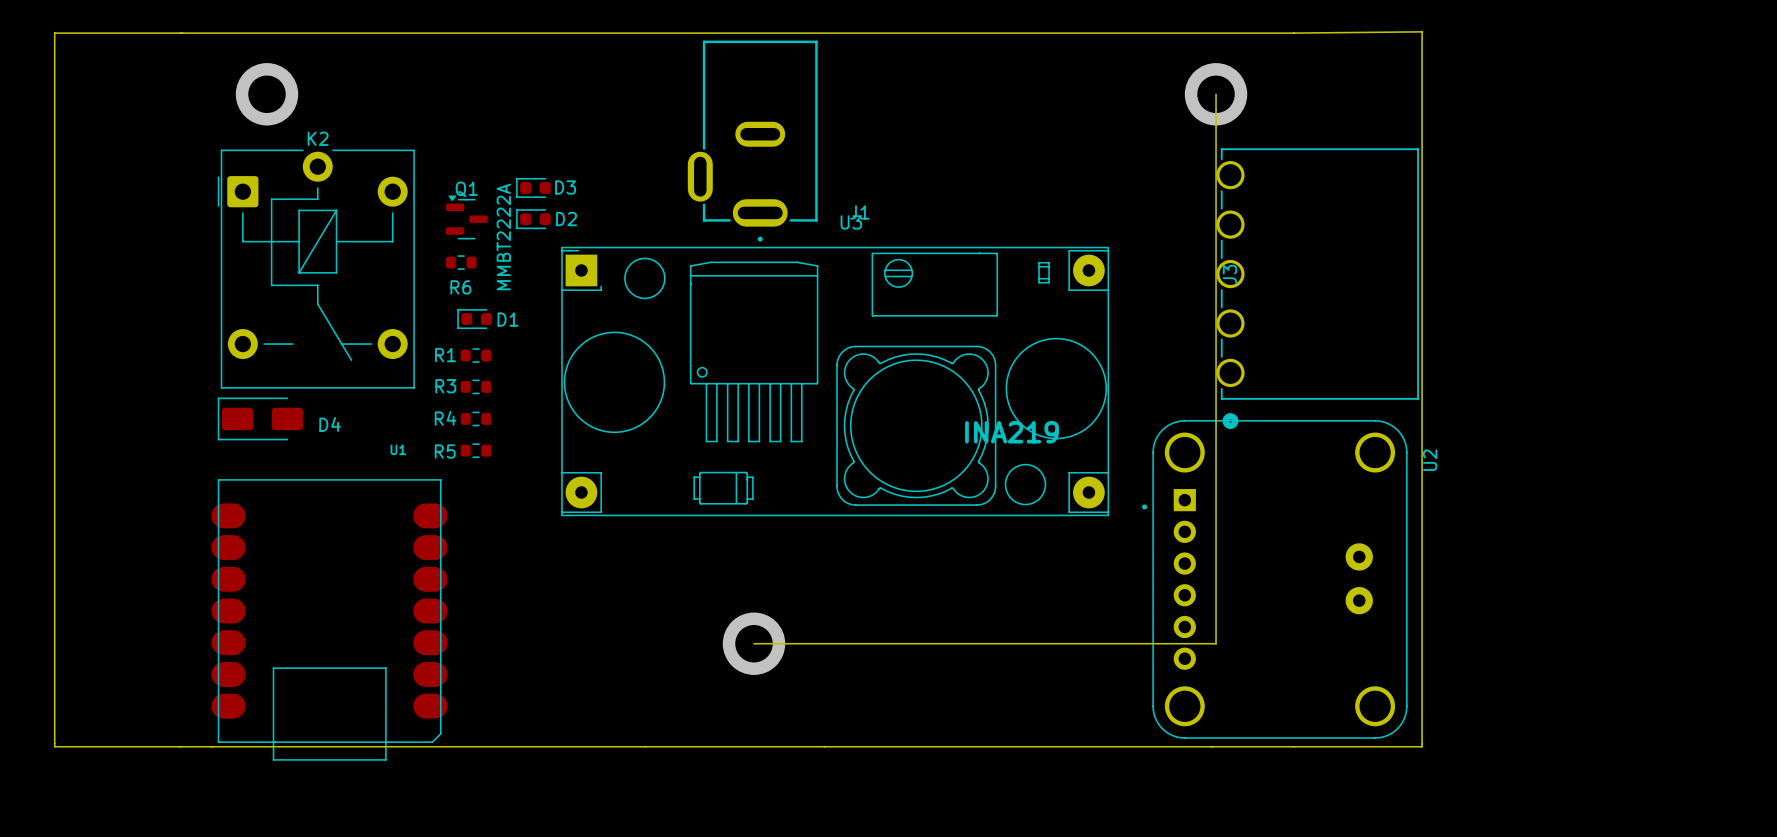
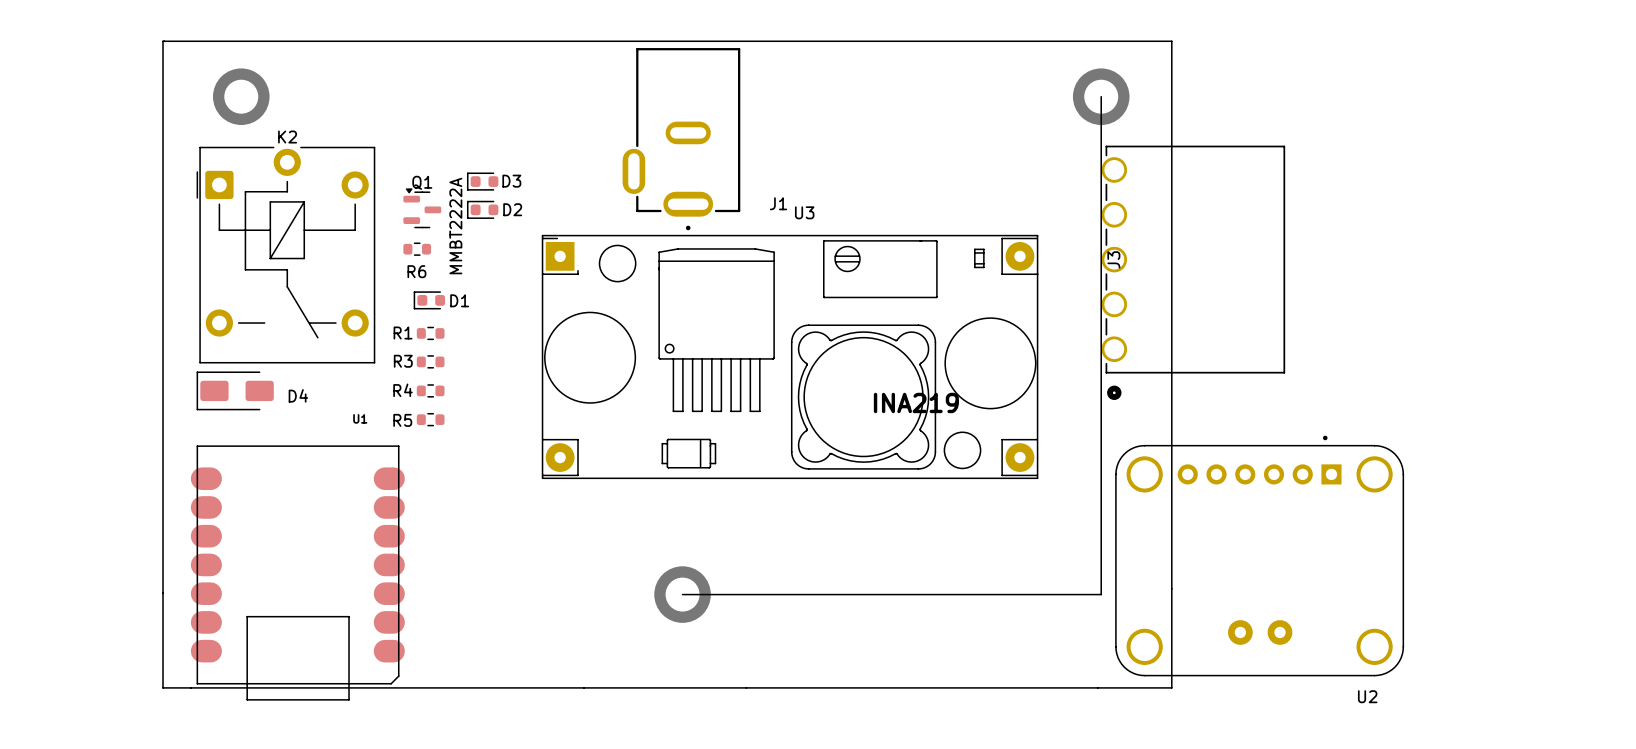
board edge: (180, 33) (54, 33) (54, 746) (180, 746) -> (163, 41) (163, 687)
board edge: (1293, 33) (1422, 31) (1422, 746) (1293, 746) -> (1171, 41) (1171, 687)
U3 position: (835, 381) -> (790, 356)
U2 rotation: 0° (1274, 579) -> 90° clockwise (1259, 556)

